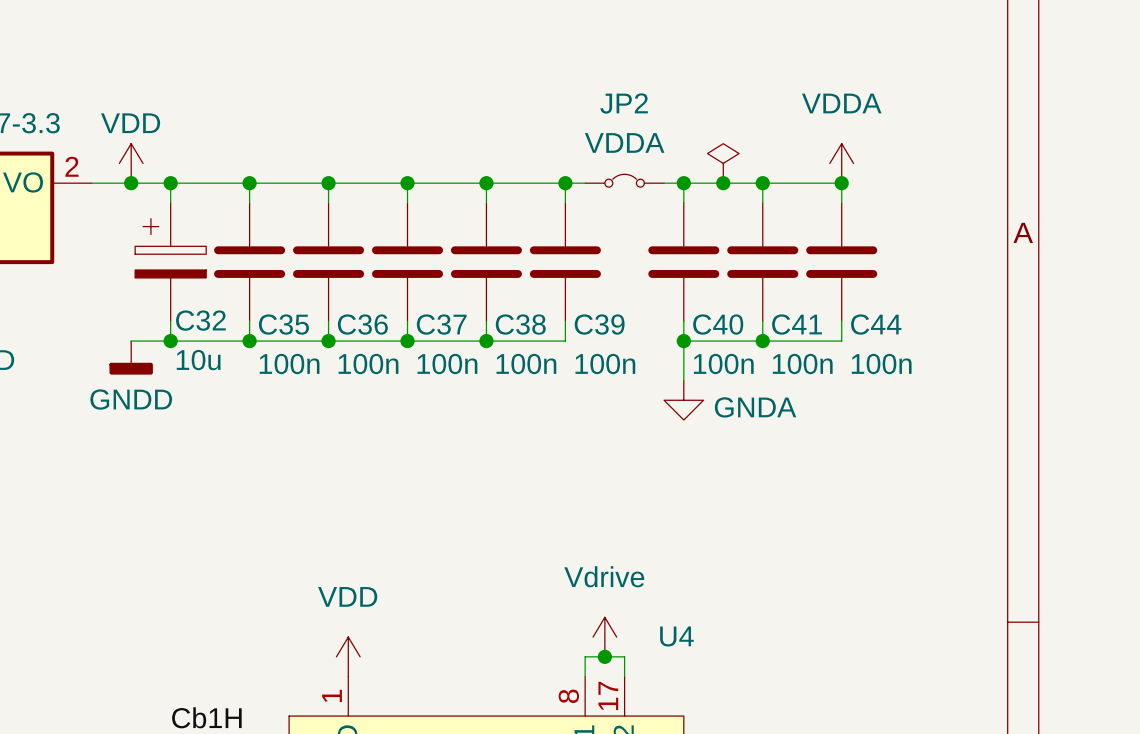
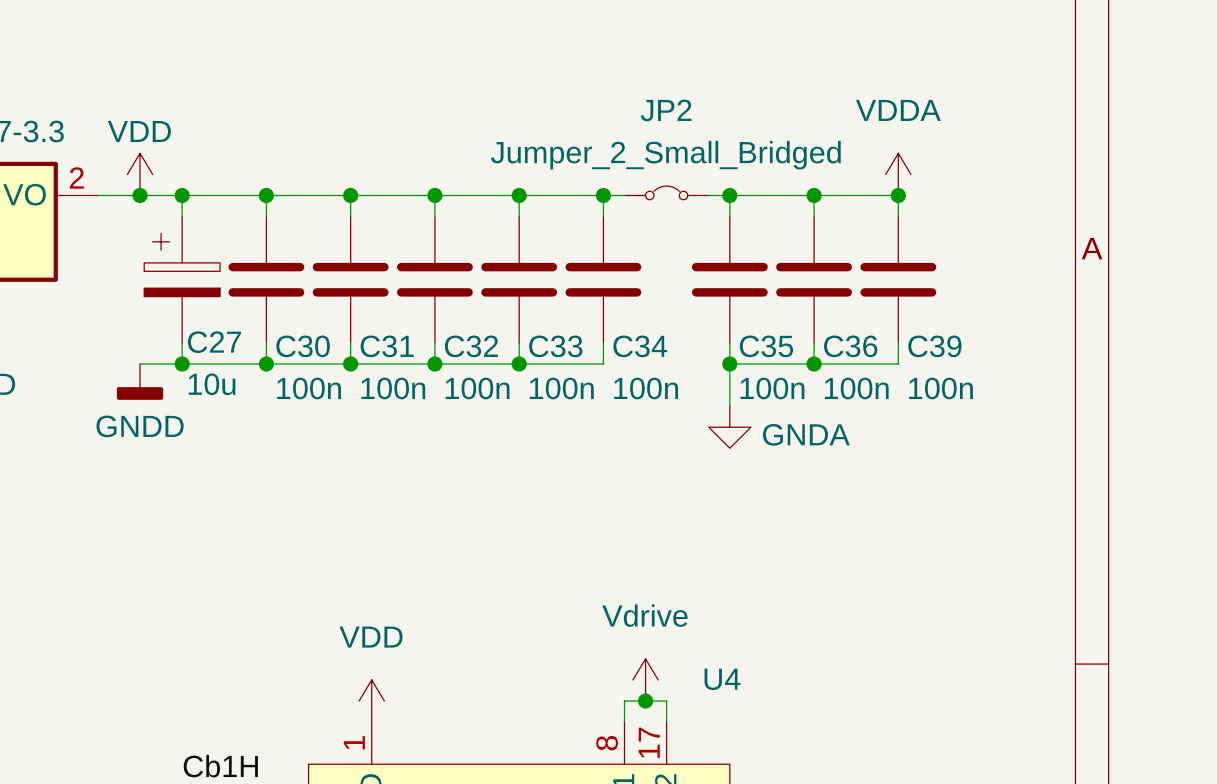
JP2 value: VDDA (624, 142) -> Jumper_2_Small_Bridged (665, 155)
power symbol: (723, 163) -> none
junction: (723, 183) -> none
C32 name: C32 (200, 320) -> C27 (214, 342)
C35 name: C35 (283, 324) -> C30 (303, 346)
C36 name: C36 (362, 324) -> C31 (387, 346)
C37 name: C37 (441, 324) -> C32 (471, 346)
C38 name: C38 (520, 324) -> C33 (555, 346)
C39 name: C39 (599, 324) -> C34 (640, 346)
C40 name: C40 (718, 324) -> C35 (766, 346)
C41 name: C41 (797, 324) -> C36 (850, 346)
C44 name: C44 (876, 324) -> C39 (934, 346)

